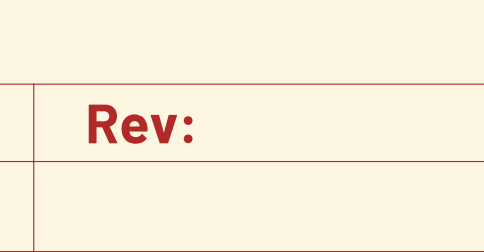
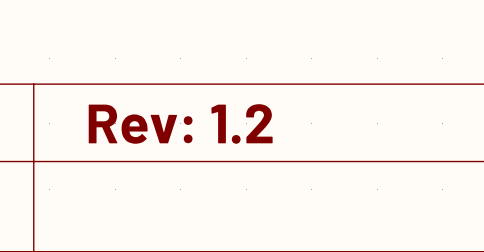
title block: Rev: (140, 124) -> Rev: 1.2 (180, 123)

